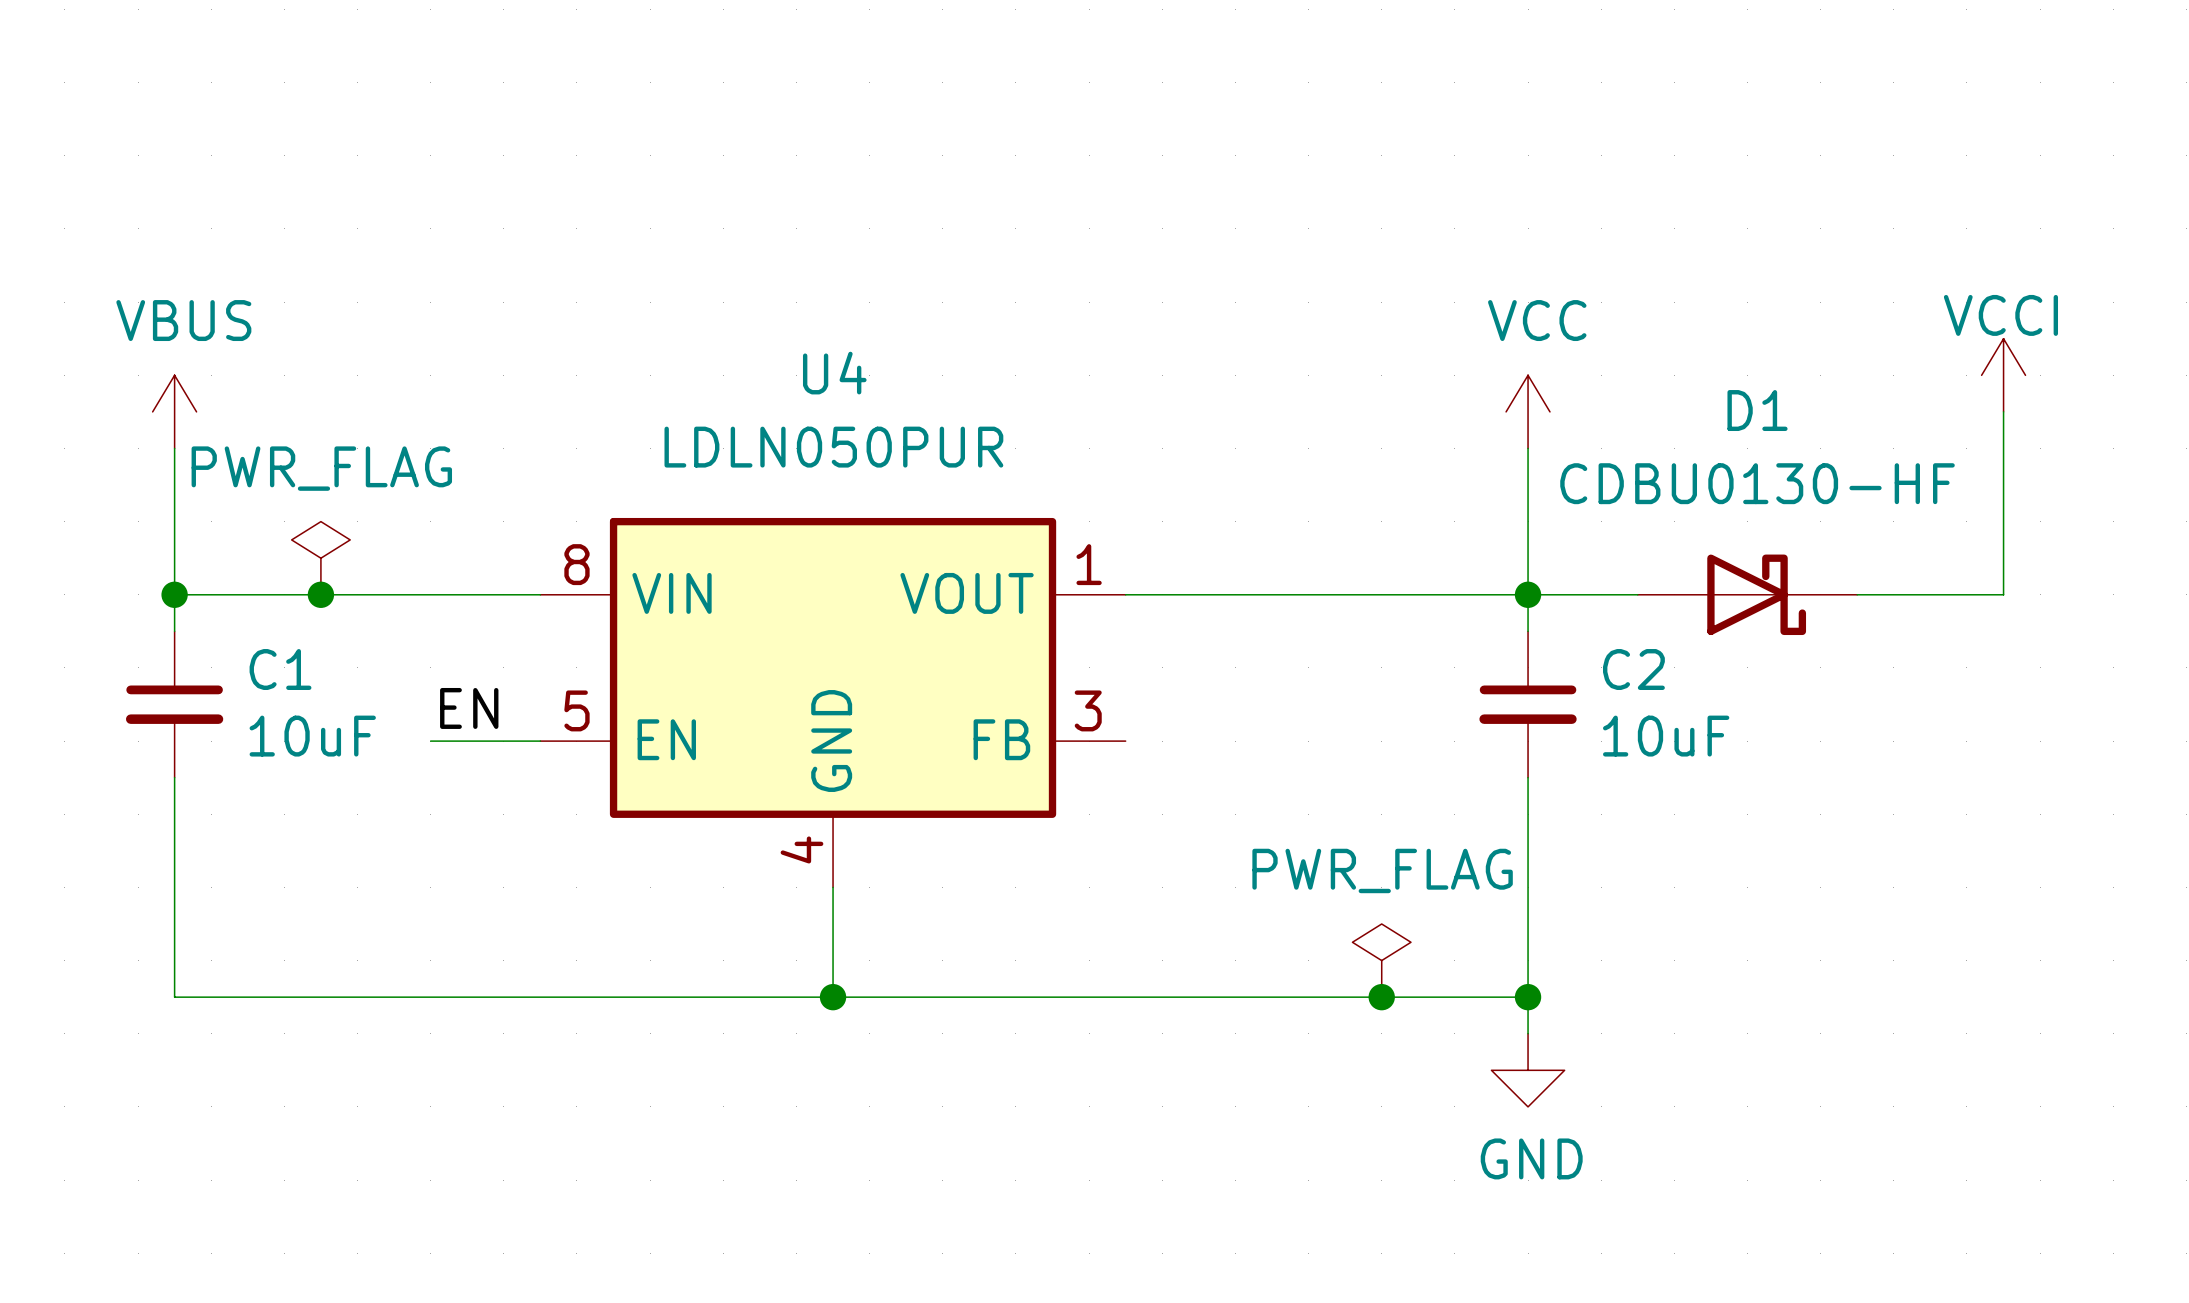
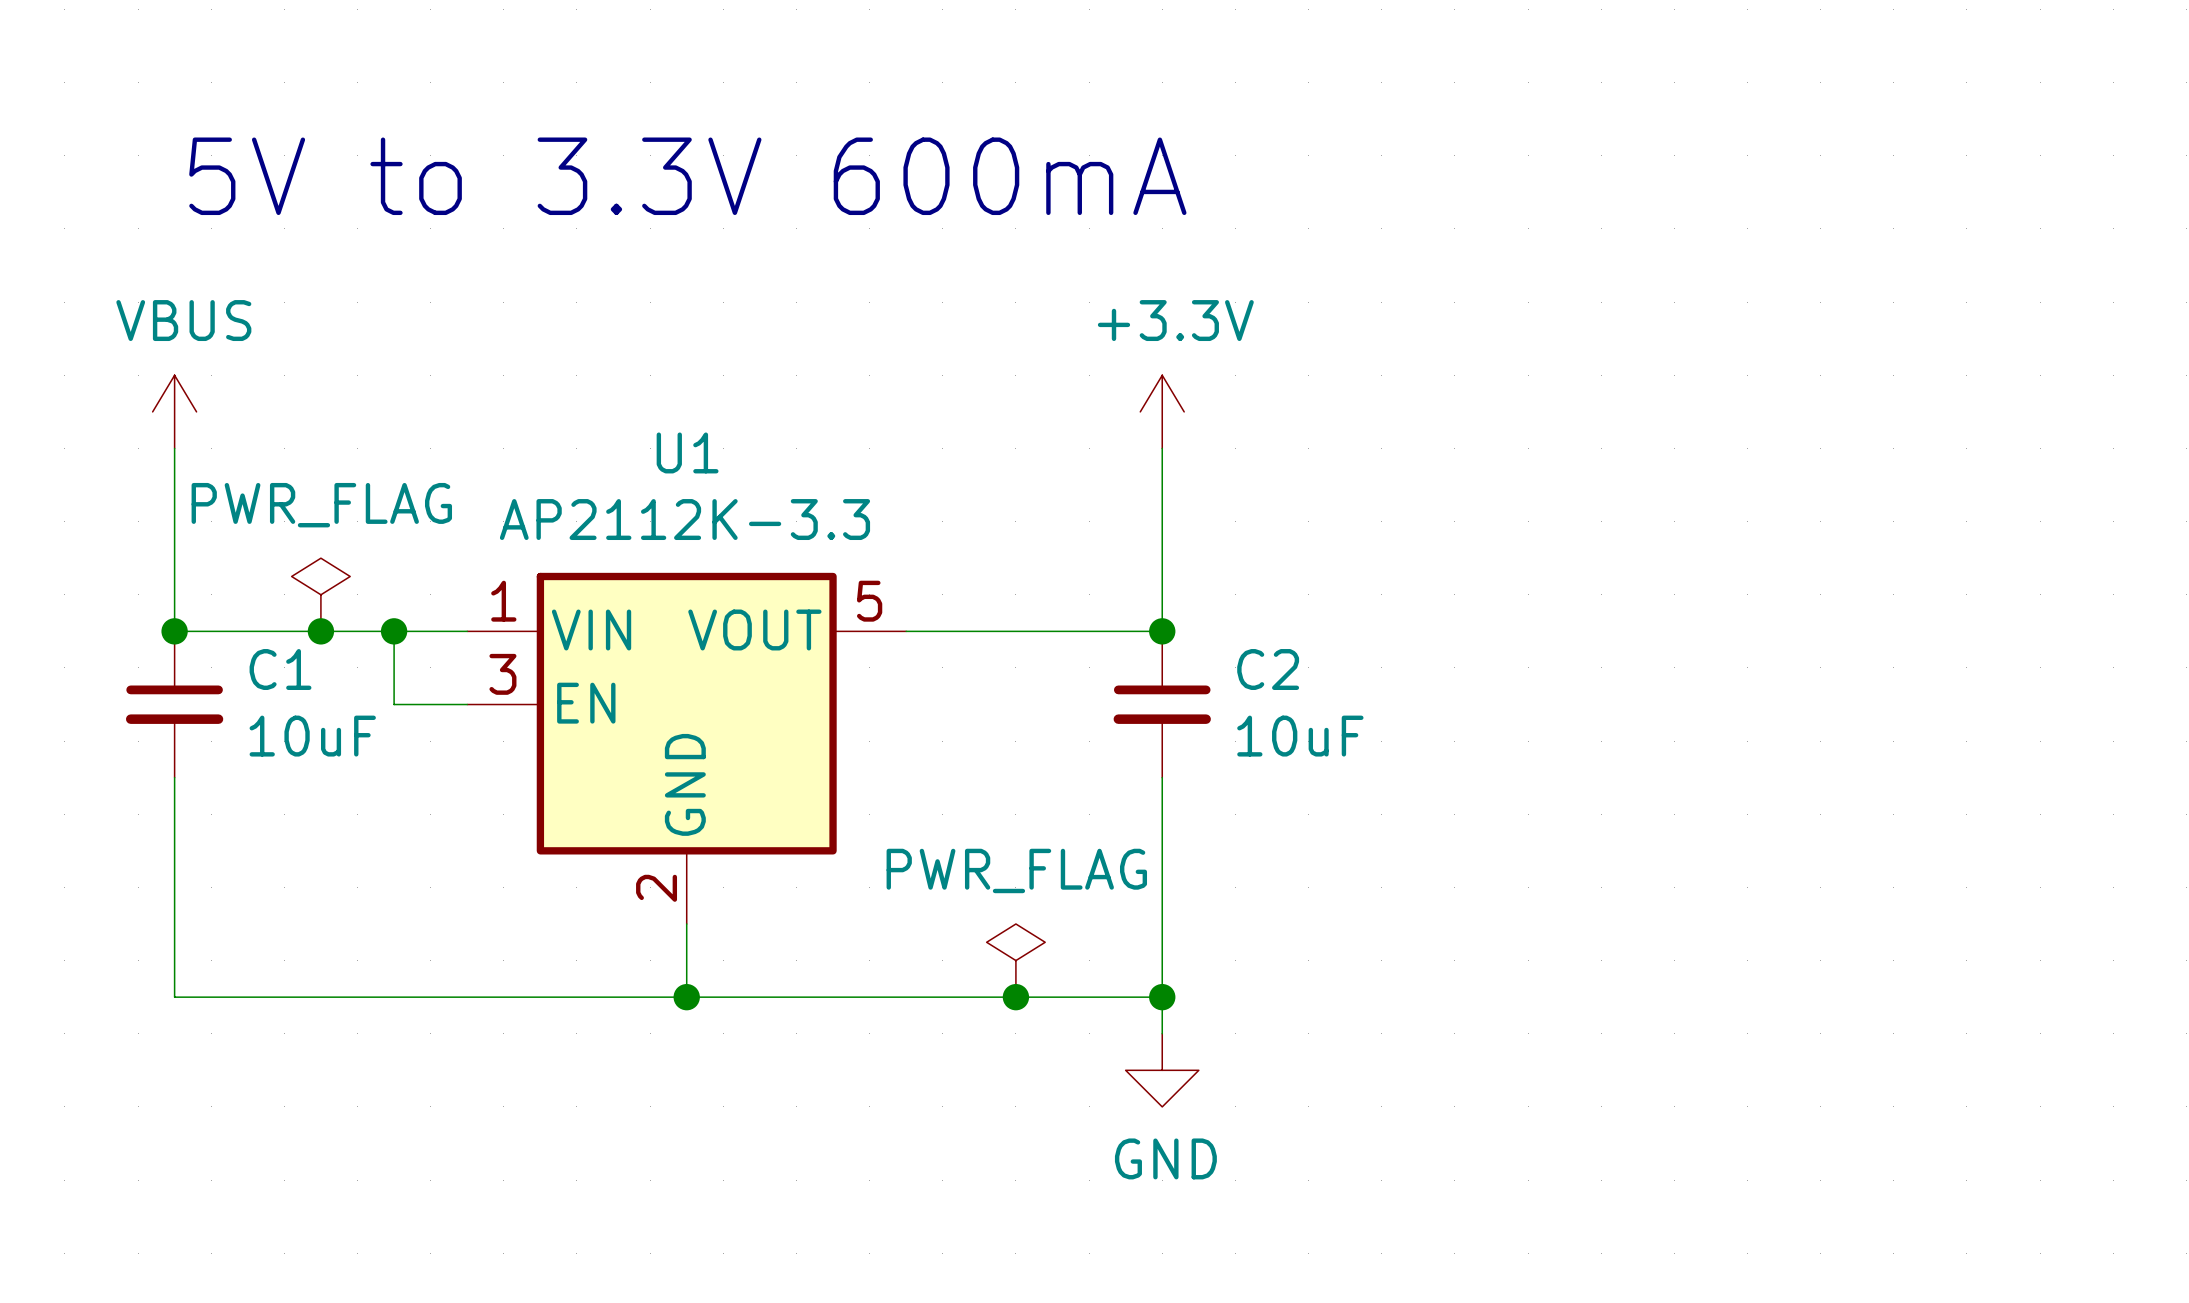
text: none -> 5V to 3.3V 600mA (687, 176)
power symbol: VCCI (2003, 375) -> none
power symbol: none -> +3.3V (1162, 411)
power symbol: VCC (1528, 411) -> none
wire: (2003, 411) (2003, 594) (1857, 594) -> none
wire: none -> (1162, 448) (1162, 631) (906, 631)
wire: (1528, 448) (1528, 631) -> none
power symbol position: PWR_FLAG (320, 558) -> PWR_FLAG (320, 594)
wire: (174, 594) (540, 594) -> none
junction position: (174, 594) -> (174, 631)
junction position: (320, 594) -> (320, 631)
wire: (1125, 594) (1637, 594) -> none
junction: (1528, 594) -> none
D1: CDBU0130-HF (1747, 594) -> none
wire: none -> (174, 631) (467, 631)
wire: none -> (394, 631) (394, 704) (467, 704)
junction: none -> (394, 631)
junction: none -> (1162, 631)
U4: LDLN050PUR (833, 702) -> none
C2 position: (1528, 704) -> (1162, 704)
label: EN (469, 708) -> none
wire: (430, 741) (540, 741) -> none
U1: none -> AP2112K-3.3 (686, 748)
wire: (1528, 777) (1528, 1033) -> (1162, 777) (1162, 1033)
wire: (833, 887) (833, 997) -> none
wire: none -> (686, 924) (686, 997)
power symbol position: PWR_FLAG (1381, 960) -> PWR_FLAG (1015, 960)
junction: none -> (686, 997)
junction: (833, 997) -> none
junction: none -> (1015, 997)
wire: (1162, 997) (1528, 997) -> none
junction: none -> (1162, 997)
junction: (1381, 997) -> none
junction: (1528, 997) -> none
power symbol position: GND (1528, 1070) -> GND (1162, 1070)

